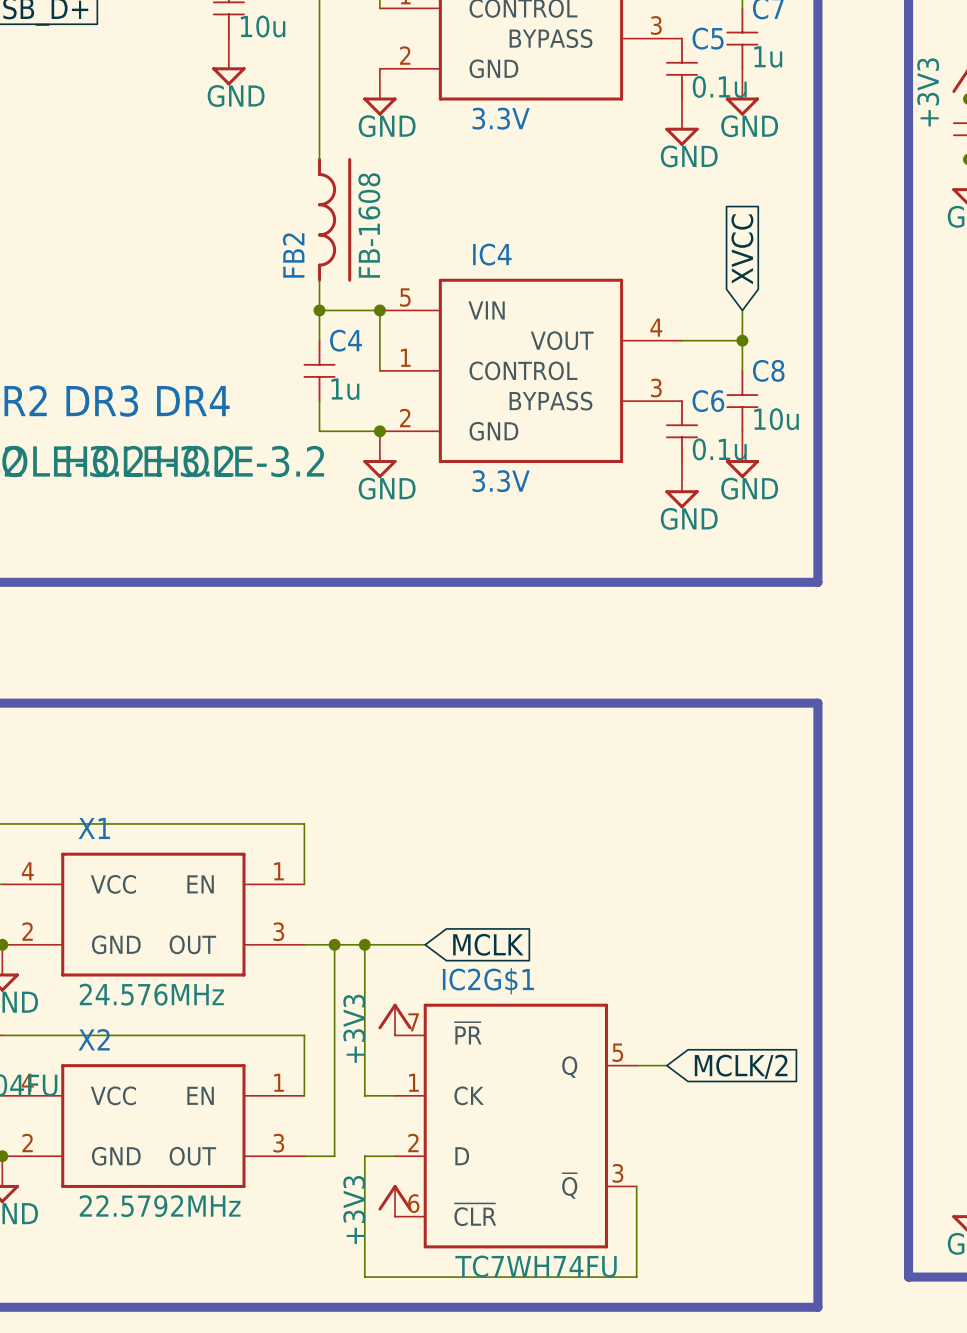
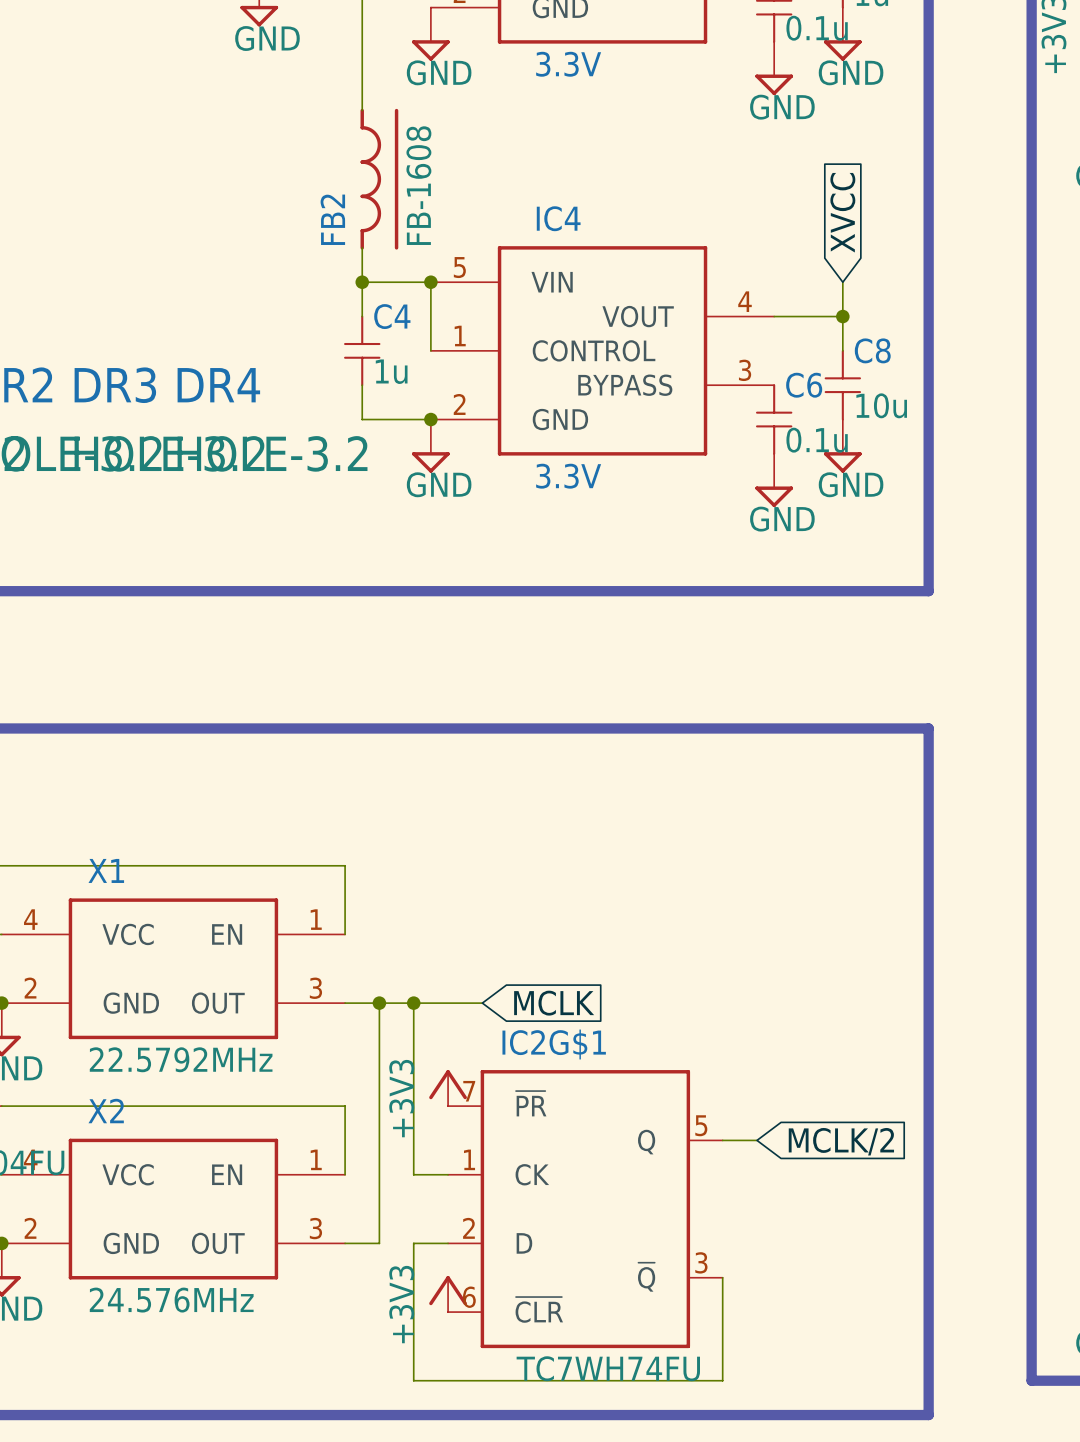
X1 value: 24.576MHz (151, 994) -> 22.5792MHz (181, 1059)
X2 value: 22.5792MHz (160, 1206) -> 24.576MHz (171, 1300)

